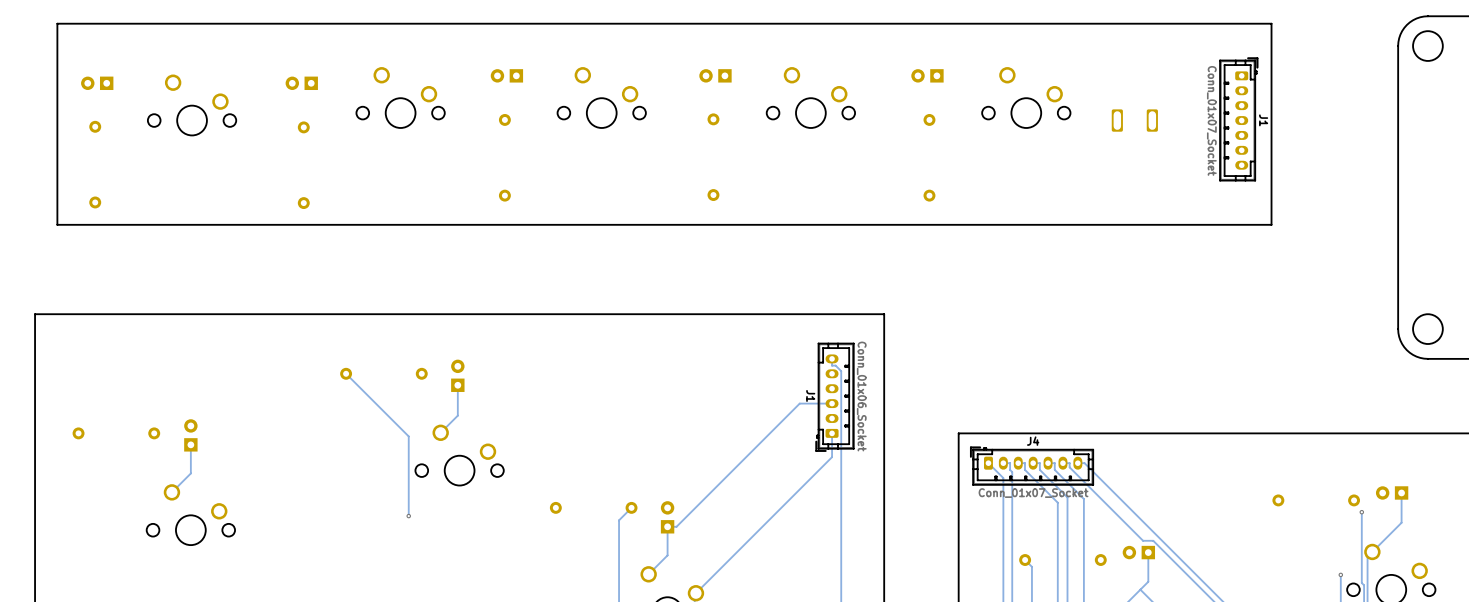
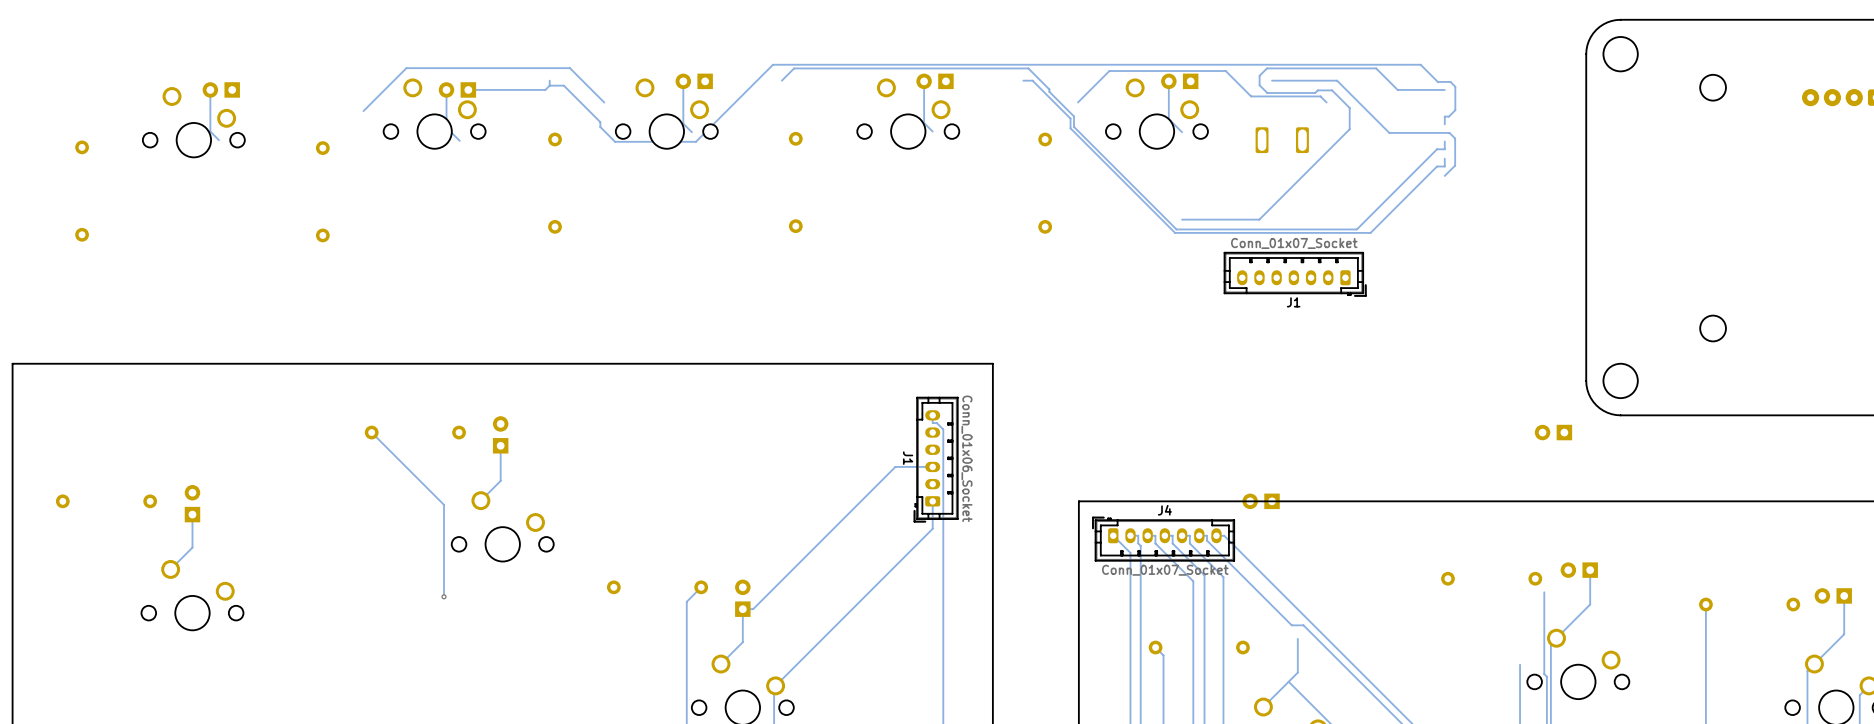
board edge: (1271, 23) (57, 23) (57, 224) (1271, 224) (1271, 23) -> none
track: none -> (549, 80) (549, 85)
track: none -> (781, 80) (794, 68) (1028, 68) (1074, 116) (1074, 126) (1176, 229) (1356, 229) (1437, 149) (1444, 149) (1444, 141)
track: none -> (1023, 80) (1032, 80) (1070, 118) (1070, 128) (1175, 232) (1370, 232) (1437, 166) (1444, 166) (1444, 158)
track: none -> (1272, 80) (1337, 80) (1389, 132) (1449, 132) (1455, 138) (1455, 165) (1444, 175)
track: none -> (683, 81) (683, 123) (691, 132)
part: none -> (694, 81)
track: none -> (924, 81) (924, 122) (932, 131)
part: none -> (935, 81)
track: none -> (1168, 81) (1168, 119) (1182, 132)
part: none -> (1179, 81)
track: none -> (549, 85) (545, 89) (468, 89)
track: none -> (549, 85) (563, 85) (600, 122) (600, 127) (615, 141) (695, 141) (773, 64) (1420, 64) (1437, 81) (1450, 81) (1455, 86) (1455, 110) (1448, 116) (1444, 116) (1444, 124)
part: (506, 75) -> none
part: (715, 75) -> none
part: (927, 75) -> none
track: none -> (210, 89) (210, 131) (218, 140)
part: none -> (221, 89)
track: none -> (446, 89) (446, 127) (459, 140)
part: none -> (457, 89)
track: none -> (1444, 89) (1397, 89) (1376, 68) (1266, 68) (1259, 75) (1259, 85) (1267, 92) (1315, 92) (1317, 90) (1332, 90) (1349, 107) (1349, 129) (1259, 219) (1182, 219)
part: (97, 83) -> none
part: (301, 83) -> none
track: none -> (604, 102) (569, 68) (406, 68) (363, 111)
track: none -> (1326, 102) (1320, 96) (1251, 96) (1225, 71) (1109, 71) (1077, 102)
J1 rotation: 0° (1238, 119) -> 90° clockwise (1295, 274)
J1 position: (1238, 119) -> (1295, 274)
part: none -> (1553, 432)
part: none -> (1261, 501)
via: (1361, 512) -> none
part: (1138, 552) -> none
via: (1340, 574) -> none

